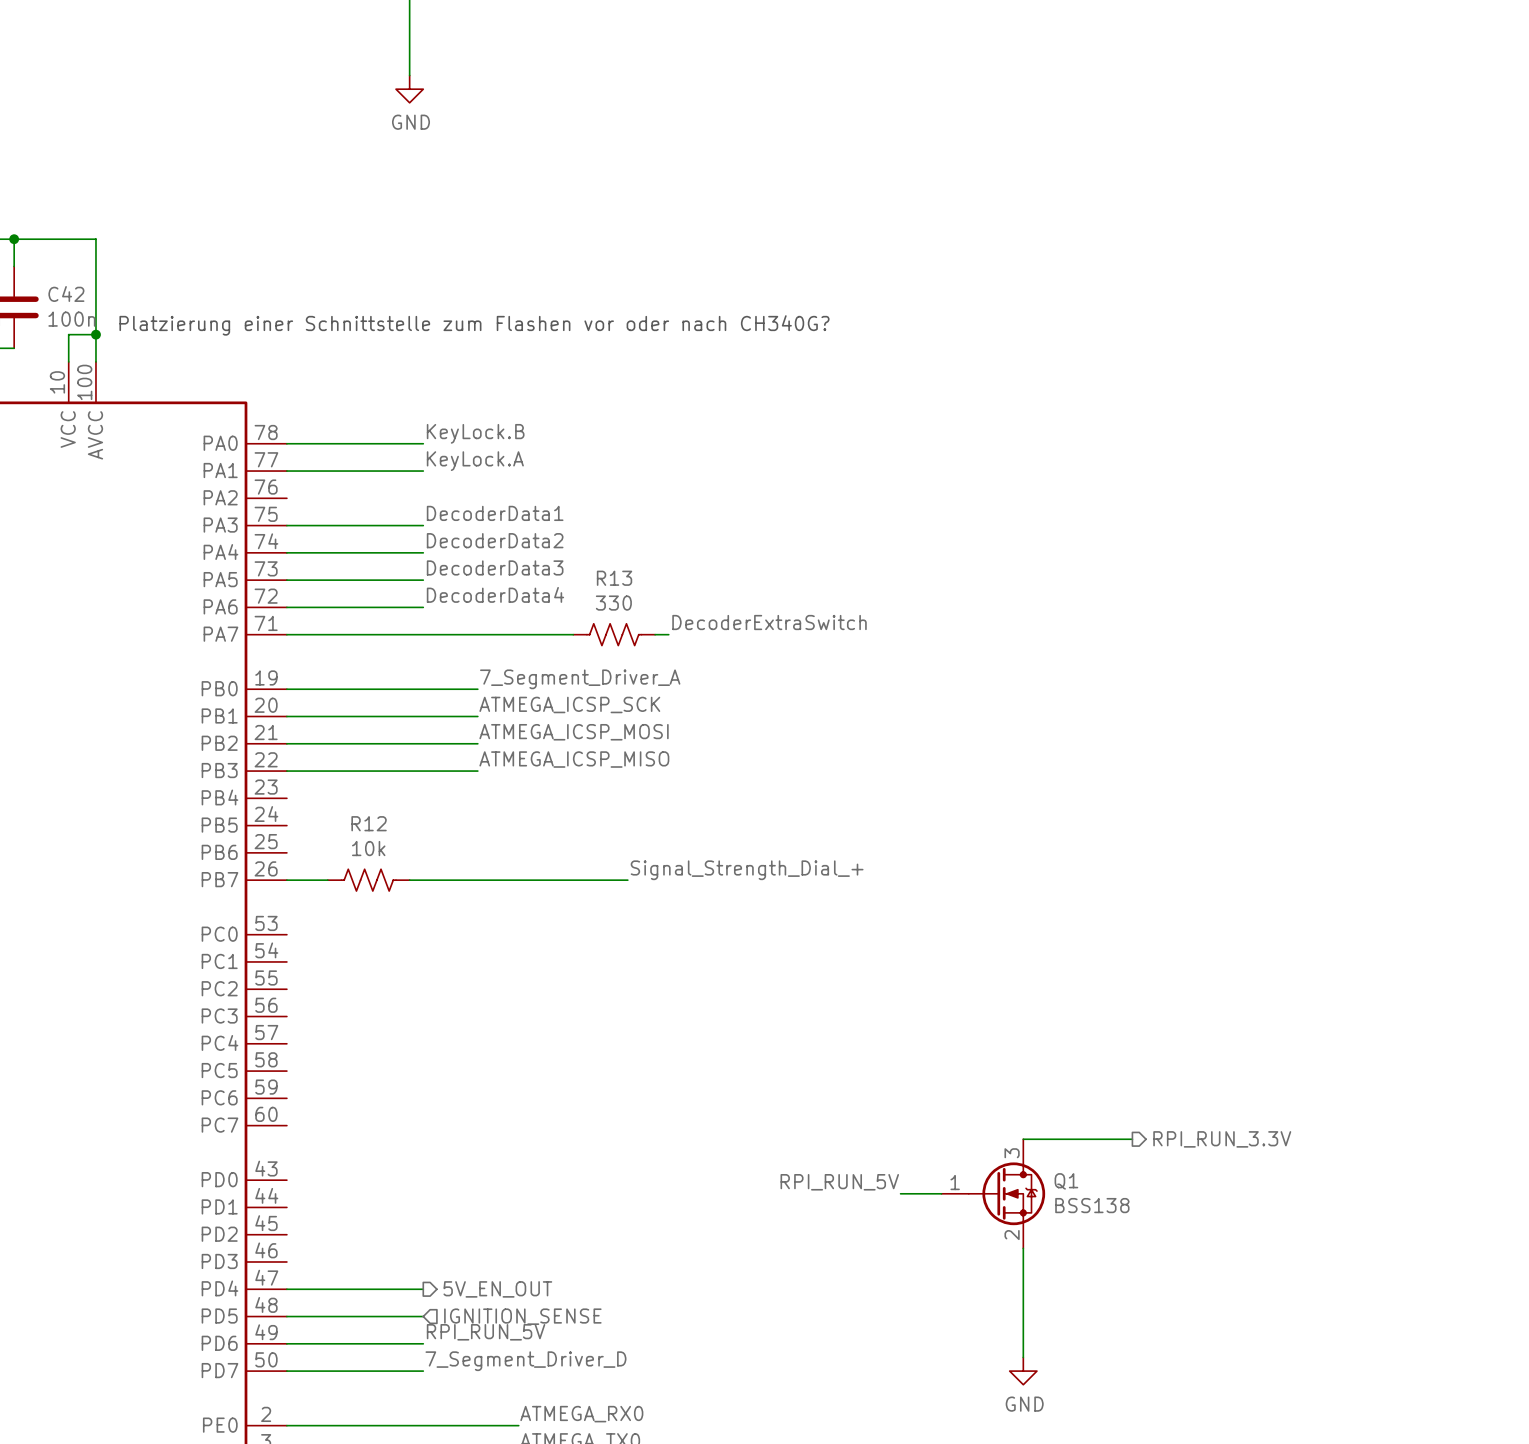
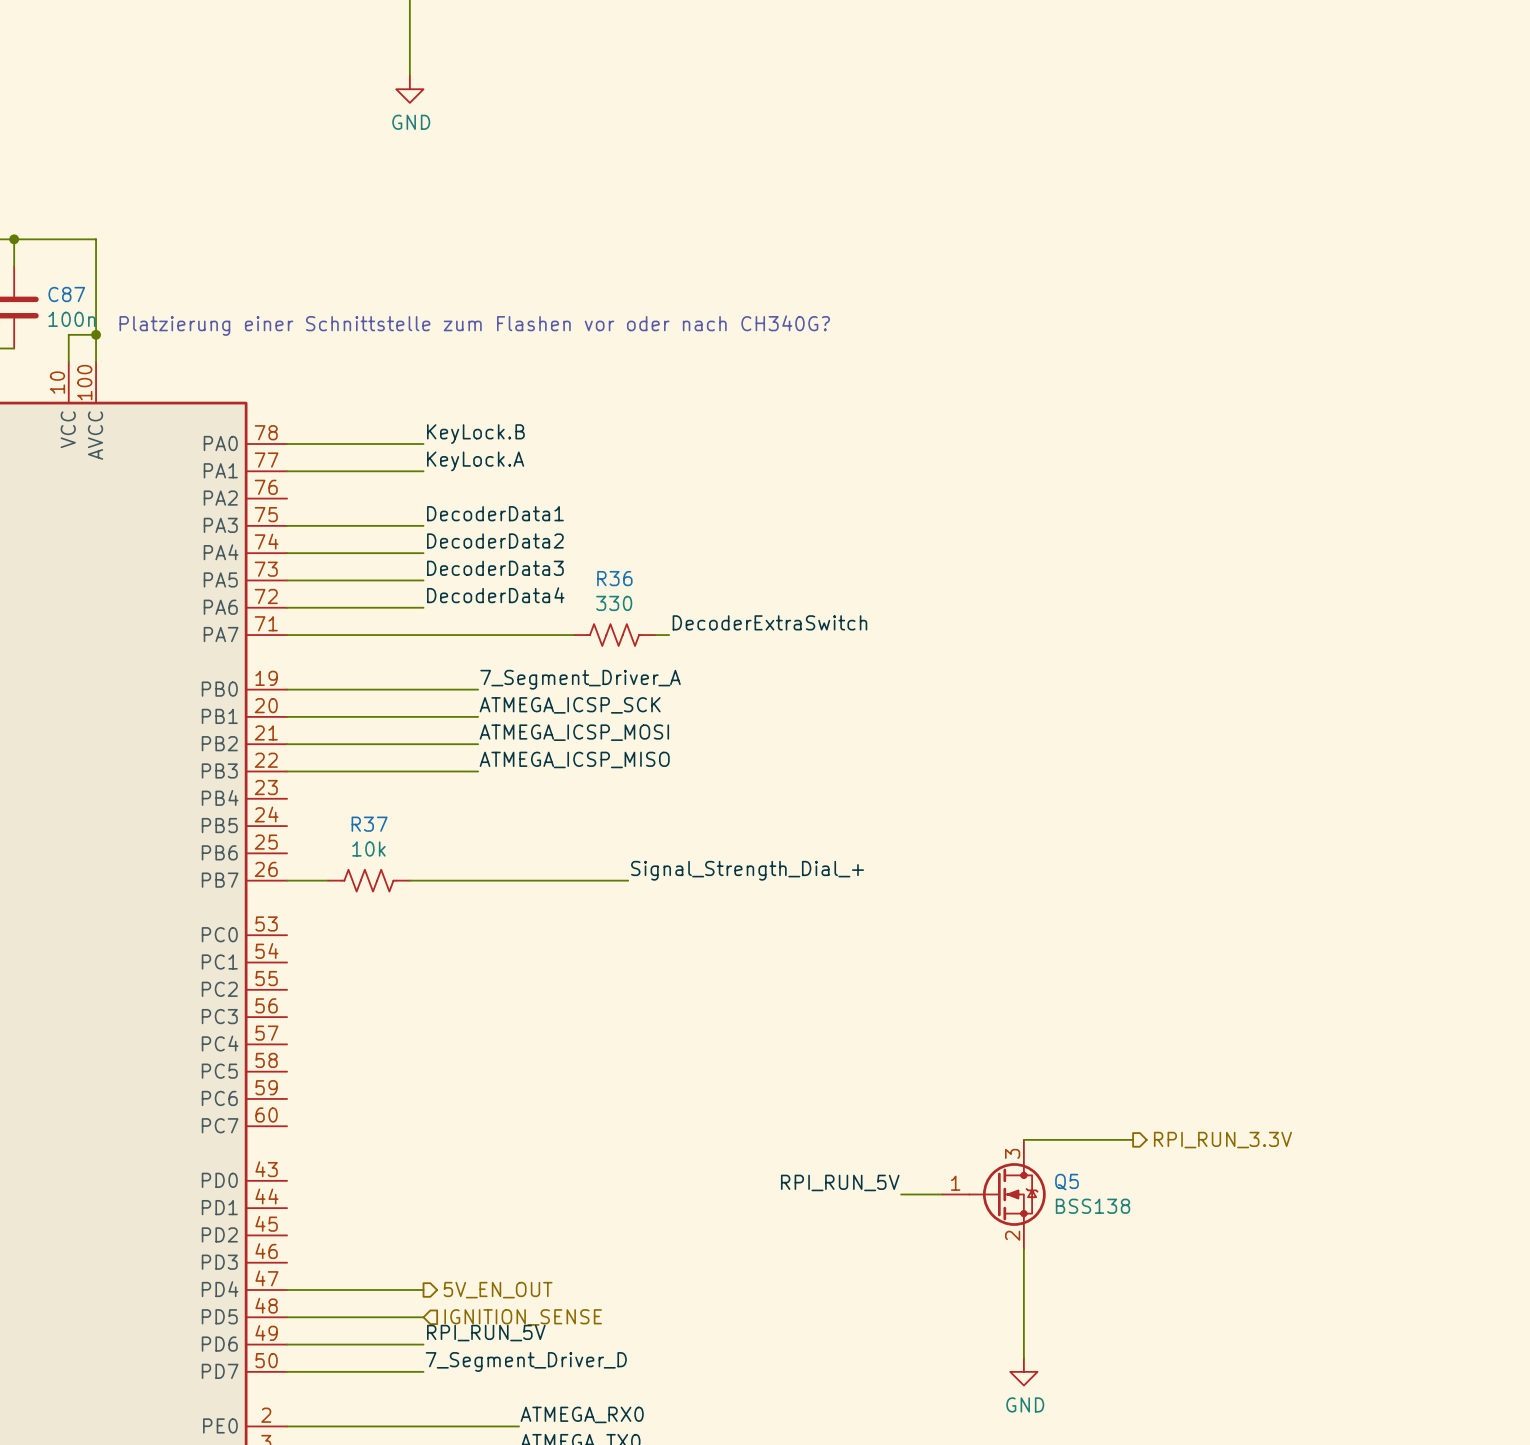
C42 name: C42 (66, 294) -> C87 (66, 294)
R13 name: R13 (614, 578) -> R36 (614, 578)
R12 name: R12 (369, 823) -> R37 (369, 824)
Q1 name: Q1 (1066, 1181) -> Q5 (1067, 1182)

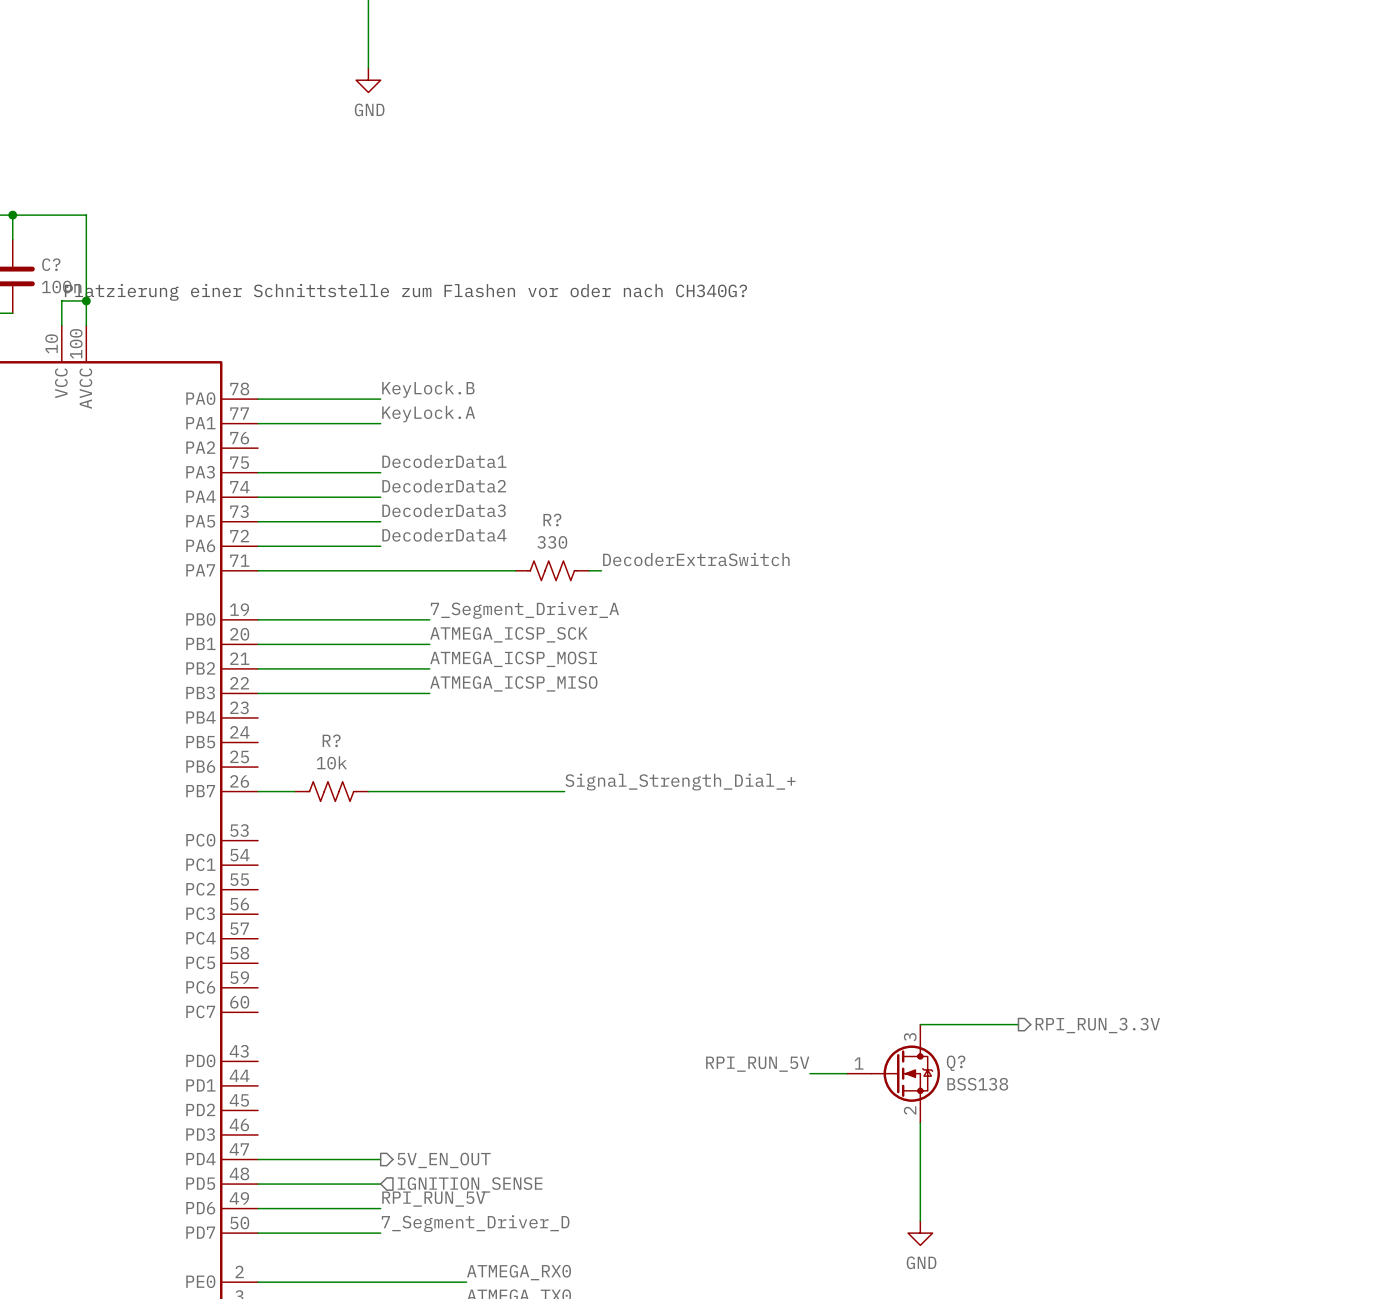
C87 name: C87 (66, 294) -> C? (51, 264)
R36 name: R36 (614, 578) -> R? (552, 520)
R37 name: R37 (369, 824) -> R? (331, 740)
Q5 name: Q5 (1067, 1182) -> Q? (956, 1063)

